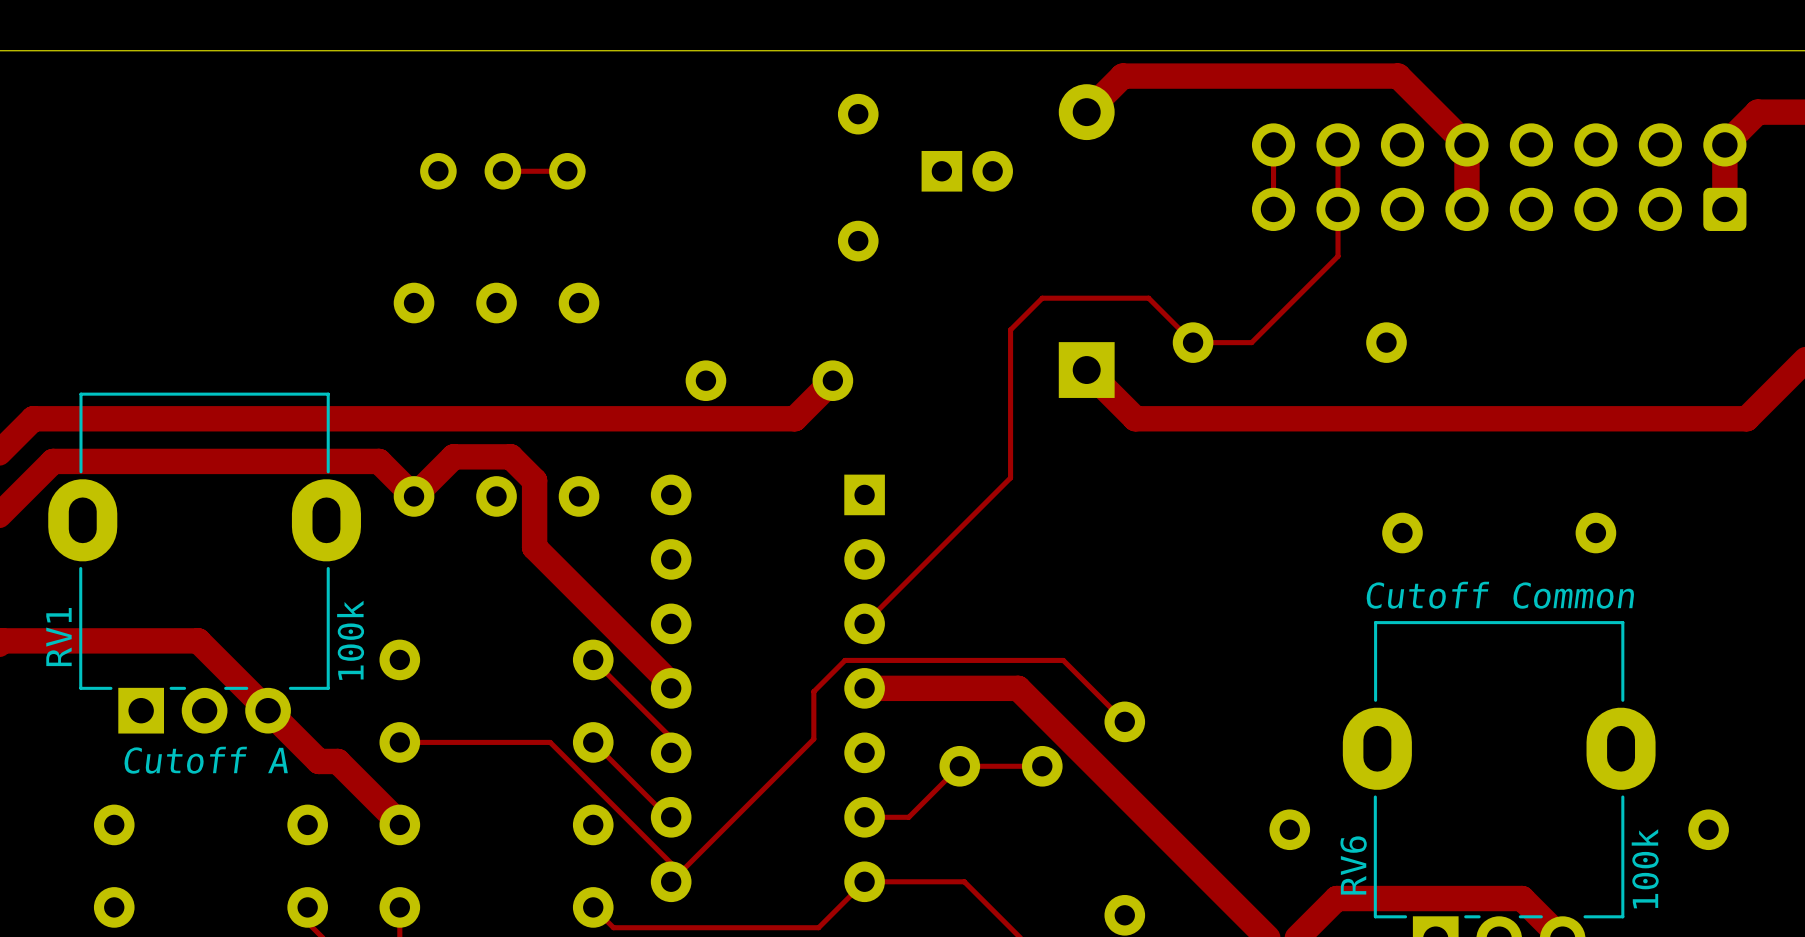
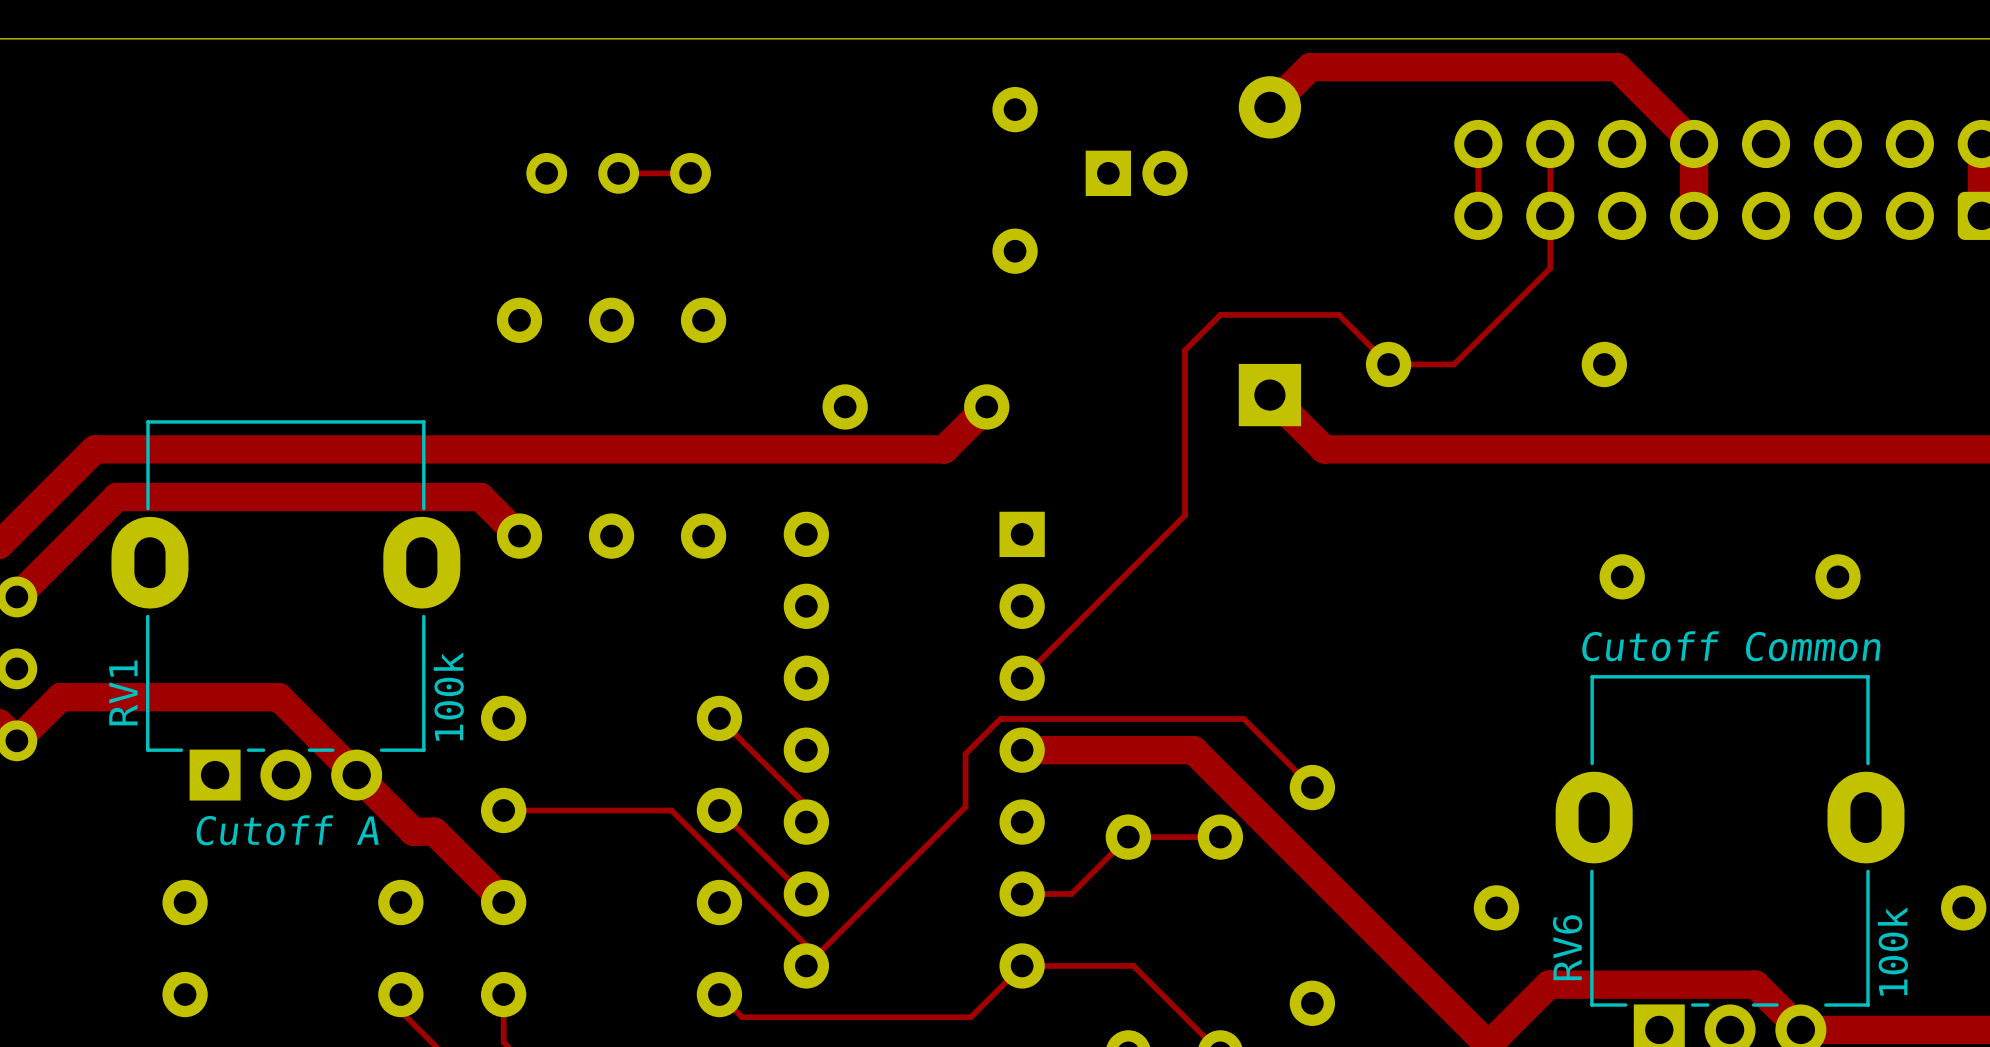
track: (414, 496) (453, 456) (510, 456) (534, 480) (534, 547) (671, 684) (671, 688) -> none

